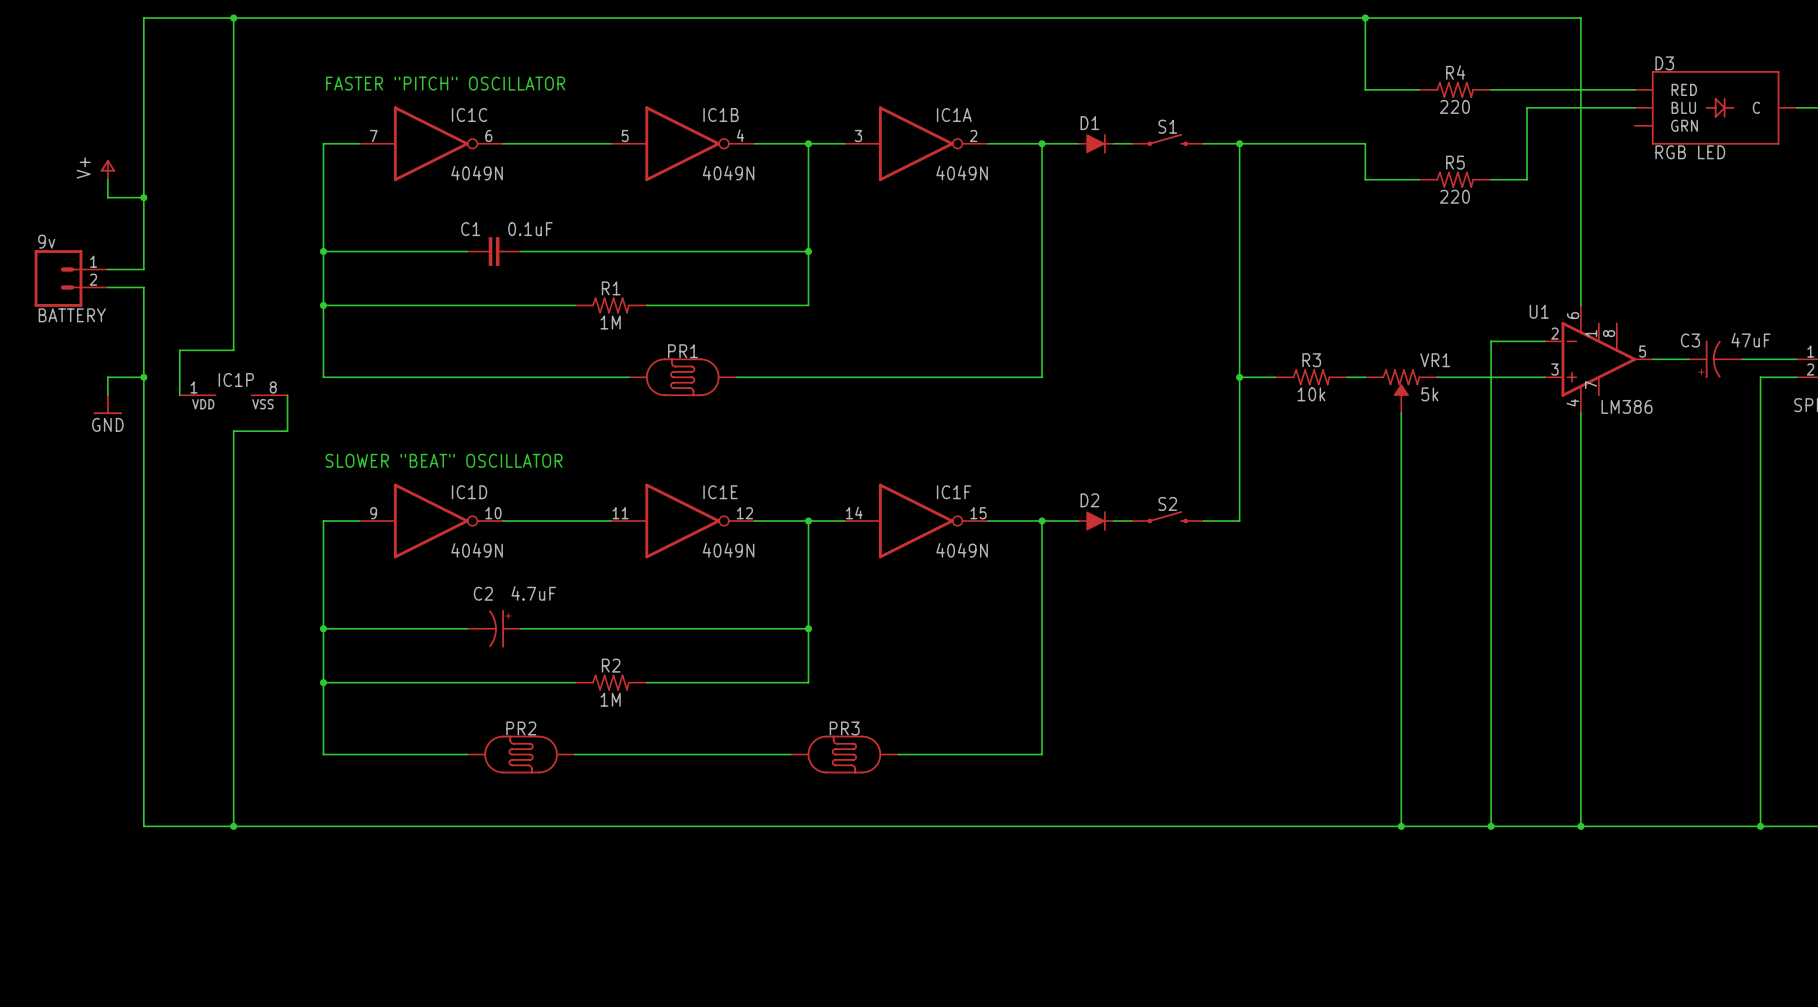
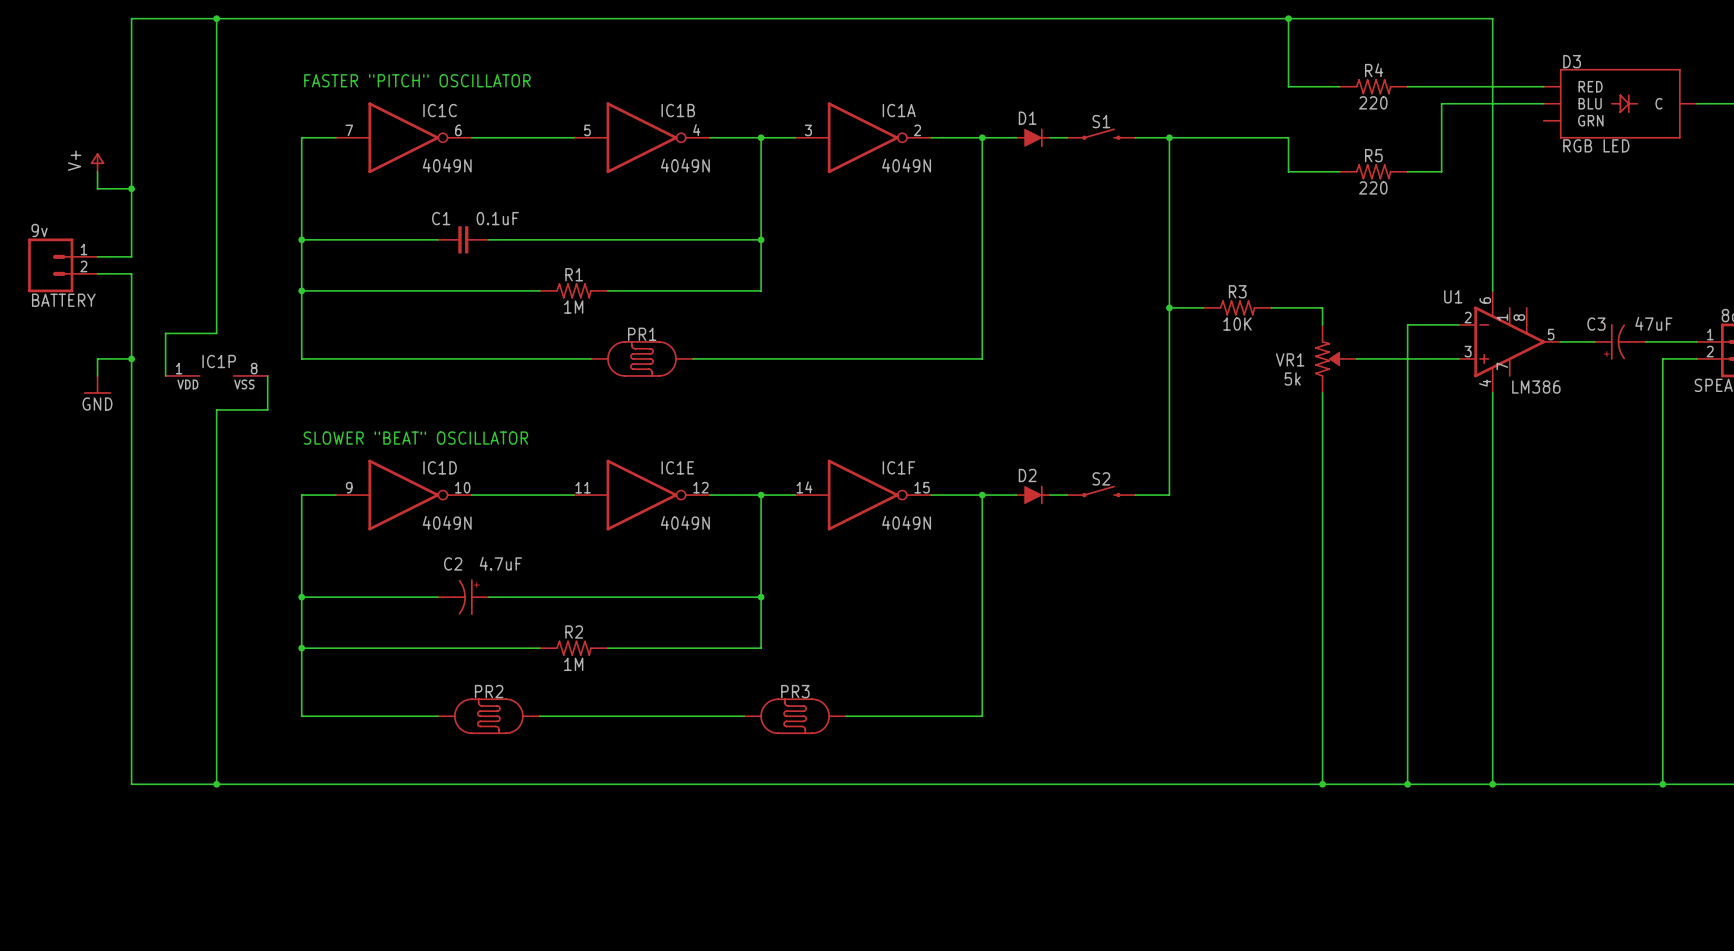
junction: none -> (1169, 307)
wire: none -> (1271, 307) (1322, 307) (1322, 324)
VR1 name position: VR1 (1435, 360) -> VR1 (1290, 359)
wire: (1239, 377) (1275, 377) -> (1169, 307) (1203, 307)
junction: (1239, 377) -> none
R3 position: (1311, 377) -> (1237, 307)
wire: (1347, 377) (1365, 377) -> none
VR1 rotation: 0° (1401, 382) -> 90° counterclockwise (1327, 358)
R3 value: 10k (1311, 394) -> 10K (1237, 324)
VR1 value position: 5k (1429, 394) -> 5k (1292, 379)

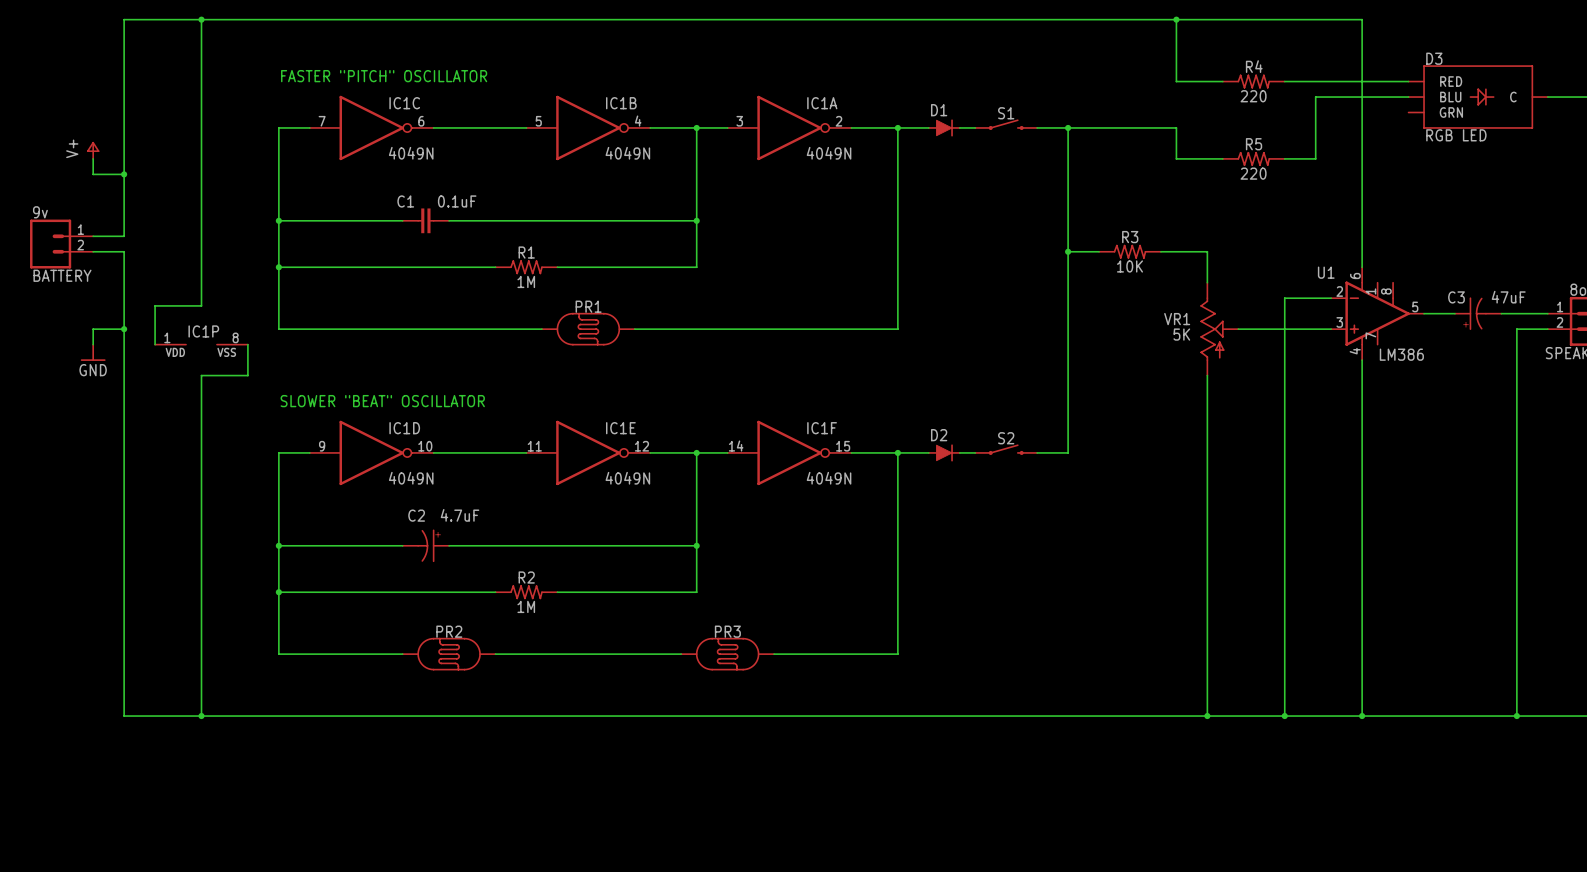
wire: none -> (1160, 251) (1207, 251) (1207, 282)
wire: (1169, 307) (1203, 307) -> (1068, 251) (1099, 251)
junction position: (1169, 307) -> (1068, 251)
R3 position: (1237, 307) -> (1130, 251)
wire: (1271, 307) (1322, 307) (1322, 324) -> none
VR1 symbol: [1315, 324, 1357, 393] -> [1200, 282, 1239, 376]
VR1 value: 5k (1292, 379) -> 5K (1181, 334)

